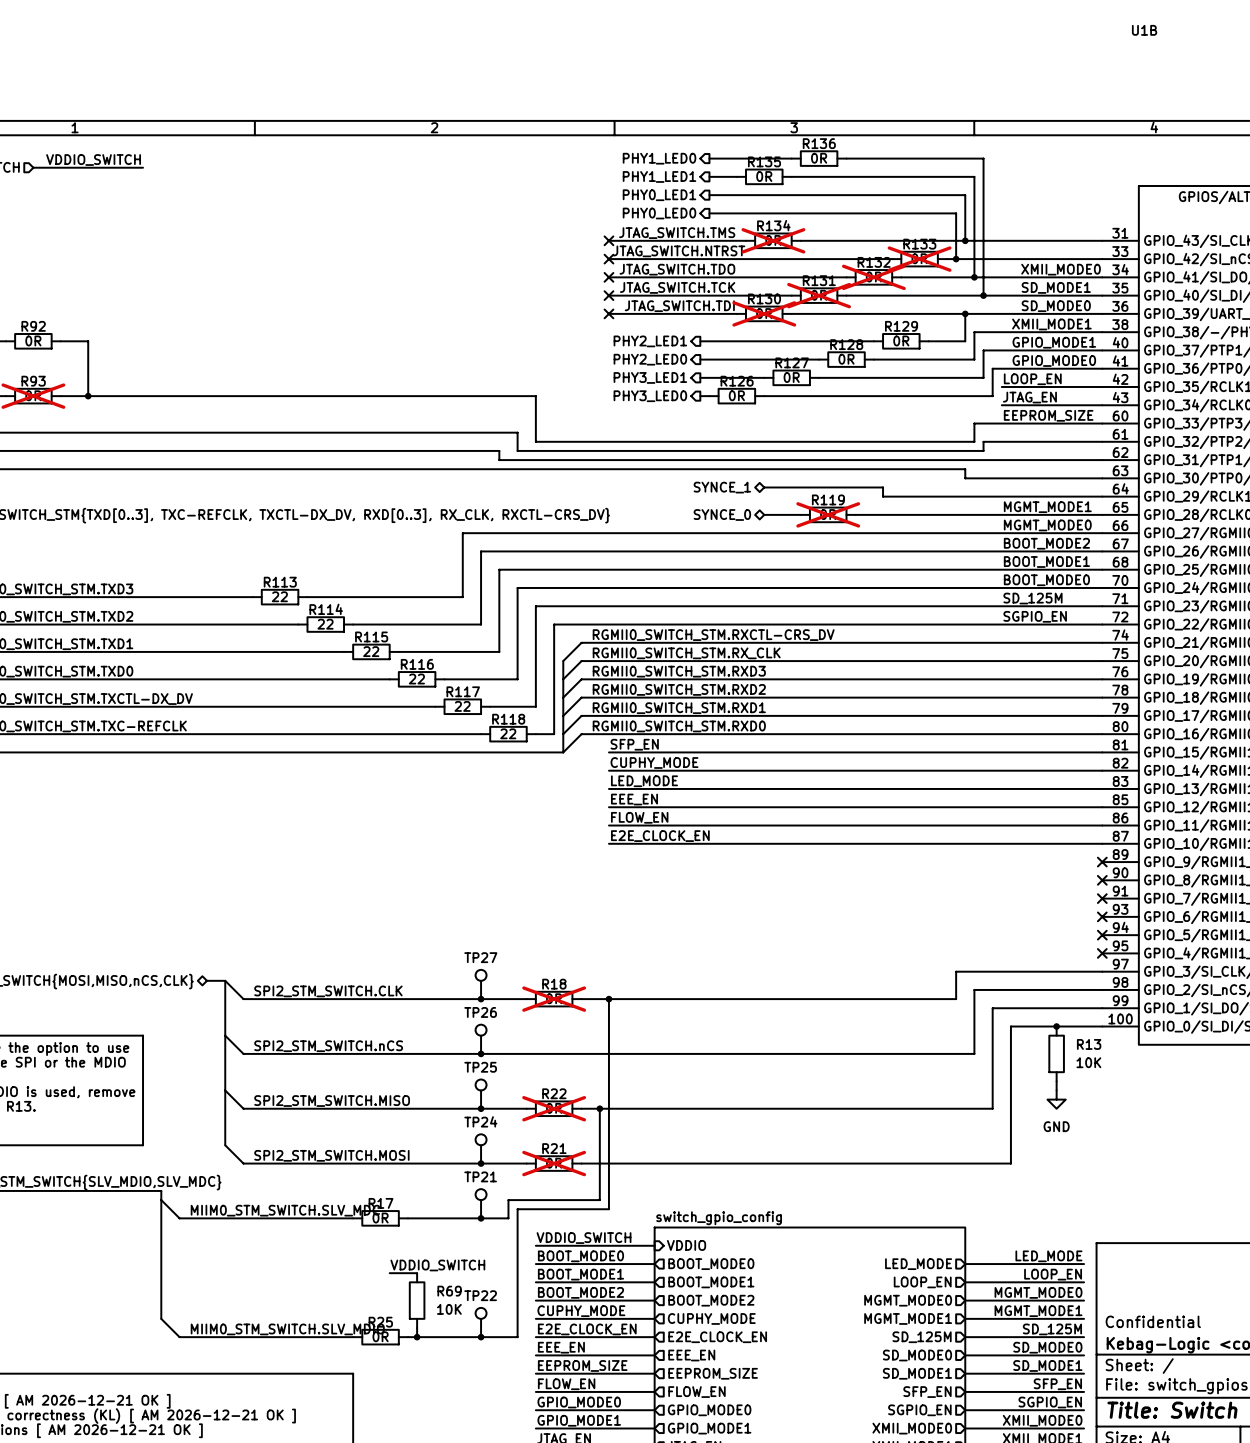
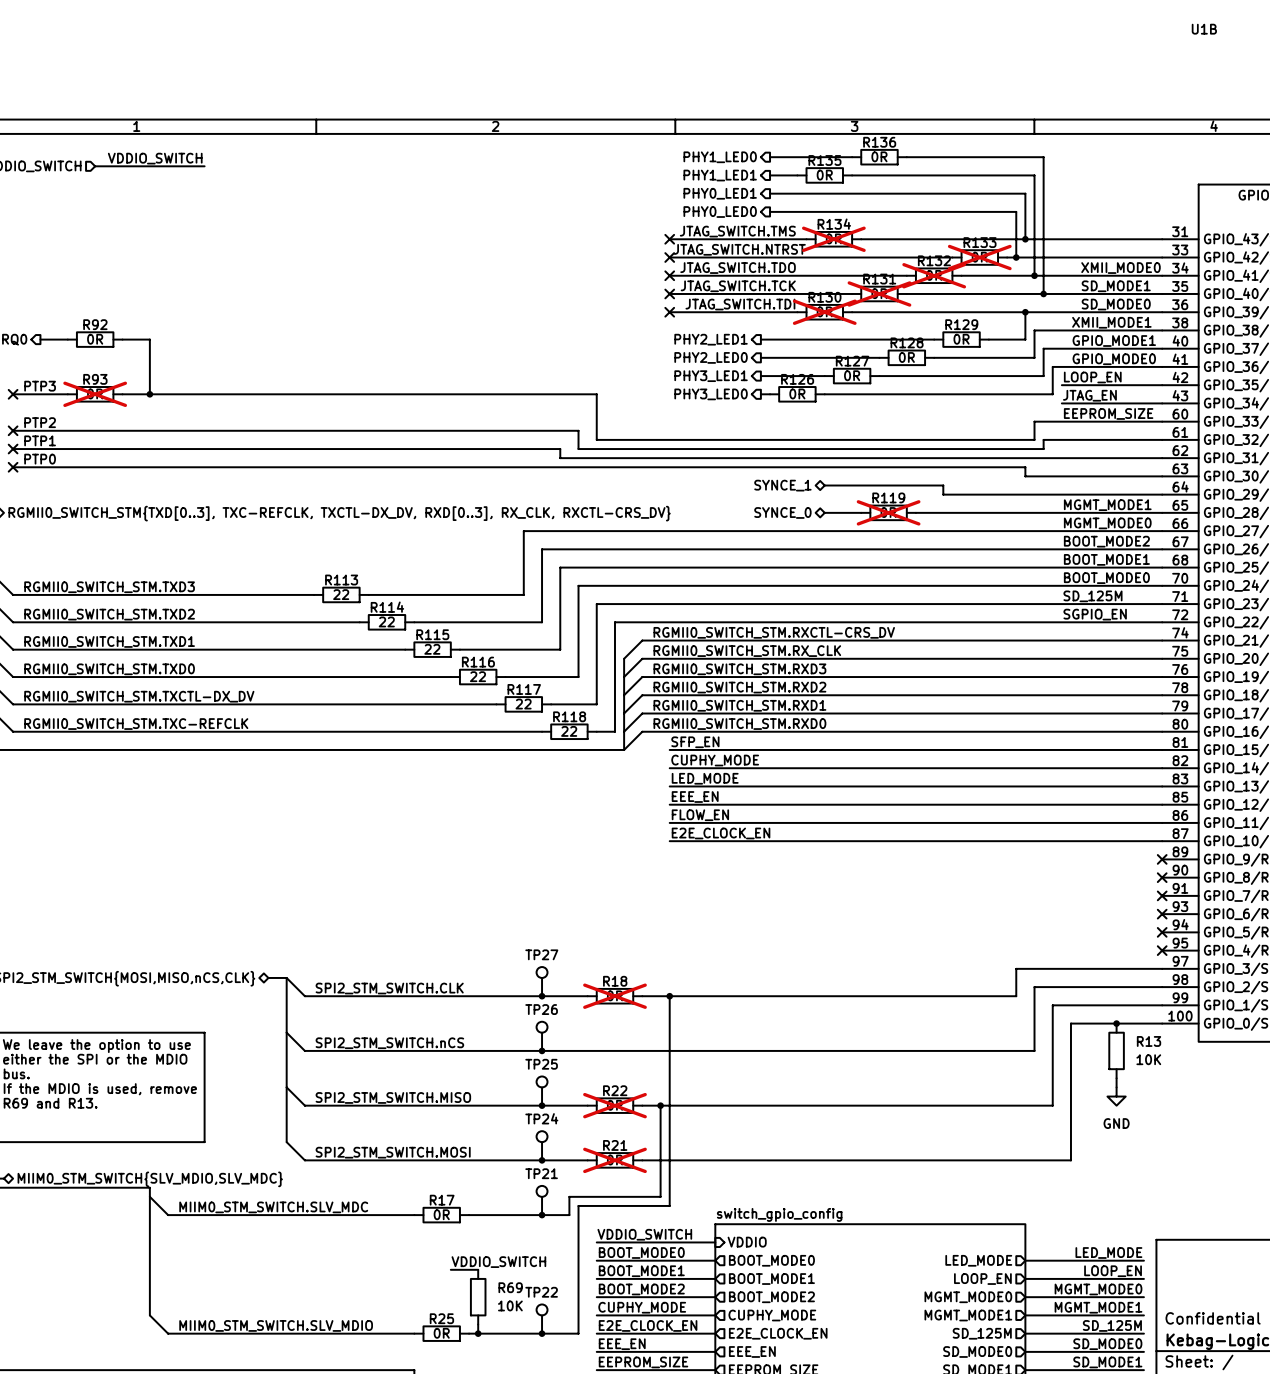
bus: (88, 1190) (161, 1190) (161, 1318) -> (149, 1187) (149, 1315)
wire: (161, 1200) (179, 1218) -> (149, 1196) (168, 1215) (241, 1215)
label position: MIIM0_STM_SWITCH.SLV_MDC (285, 1210) -> MIIM0_STM_SWITCH.SLV_MDC (273, 1207)
wire: (161, 1318) (179, 1337) -> (149, 1315) (168, 1333) (241, 1333)
label position: MIIM0_STM_SWITCH.SLV_MDIO (287, 1329) -> MIIM0_STM_SWITCH.SLV_MDIO (276, 1325)

